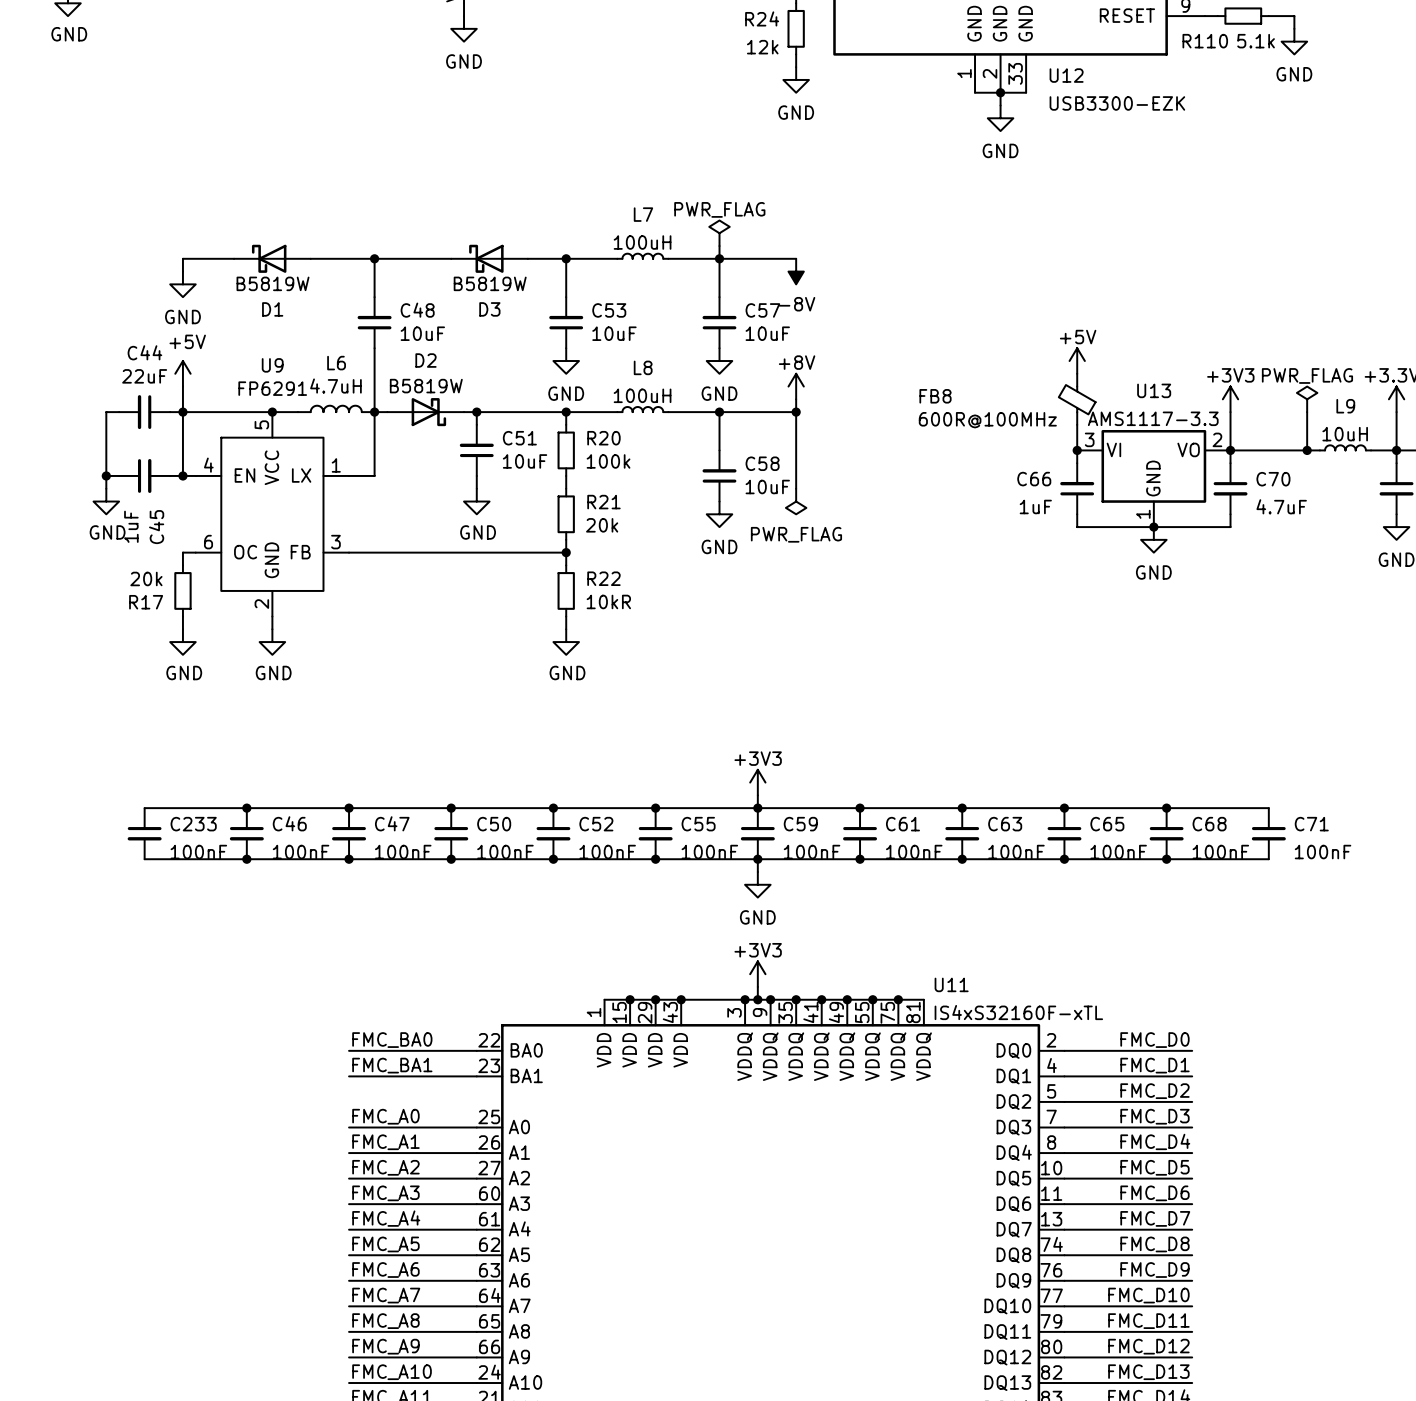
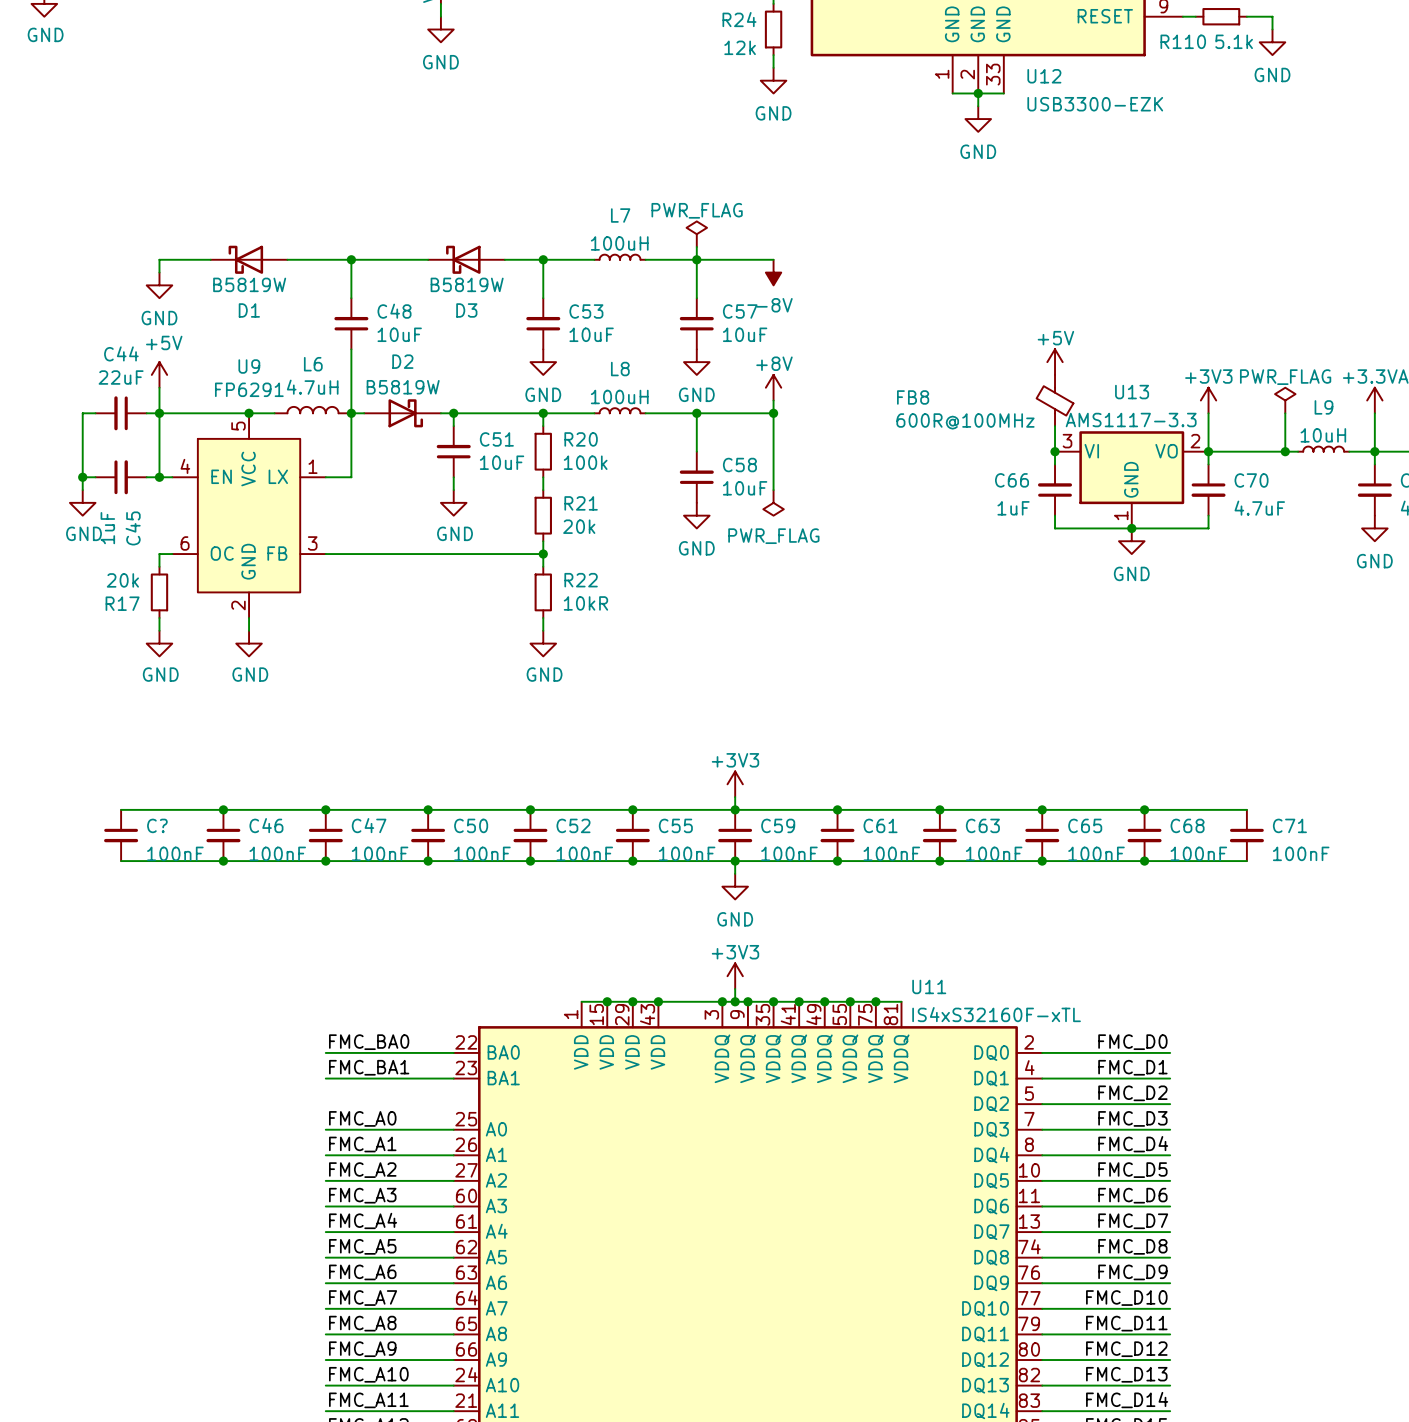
C233 name: C233 (193, 824) -> C? (157, 825)

